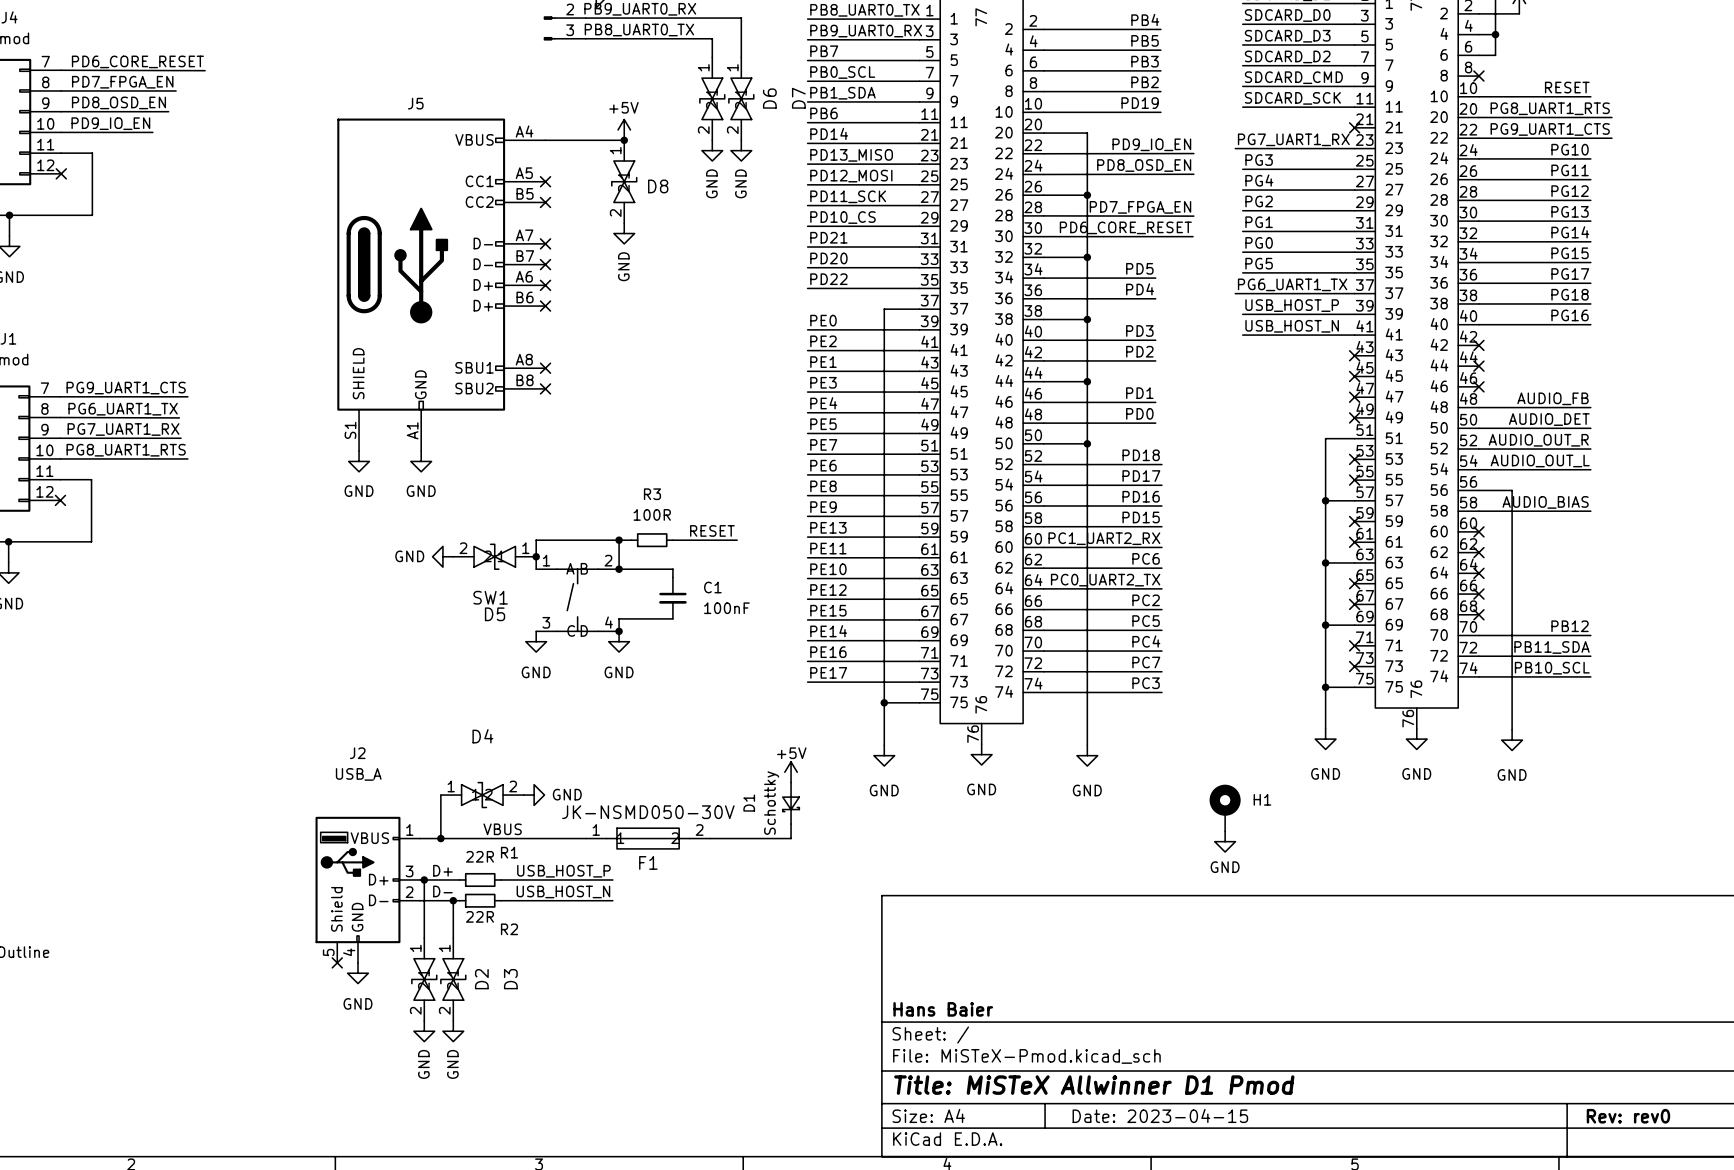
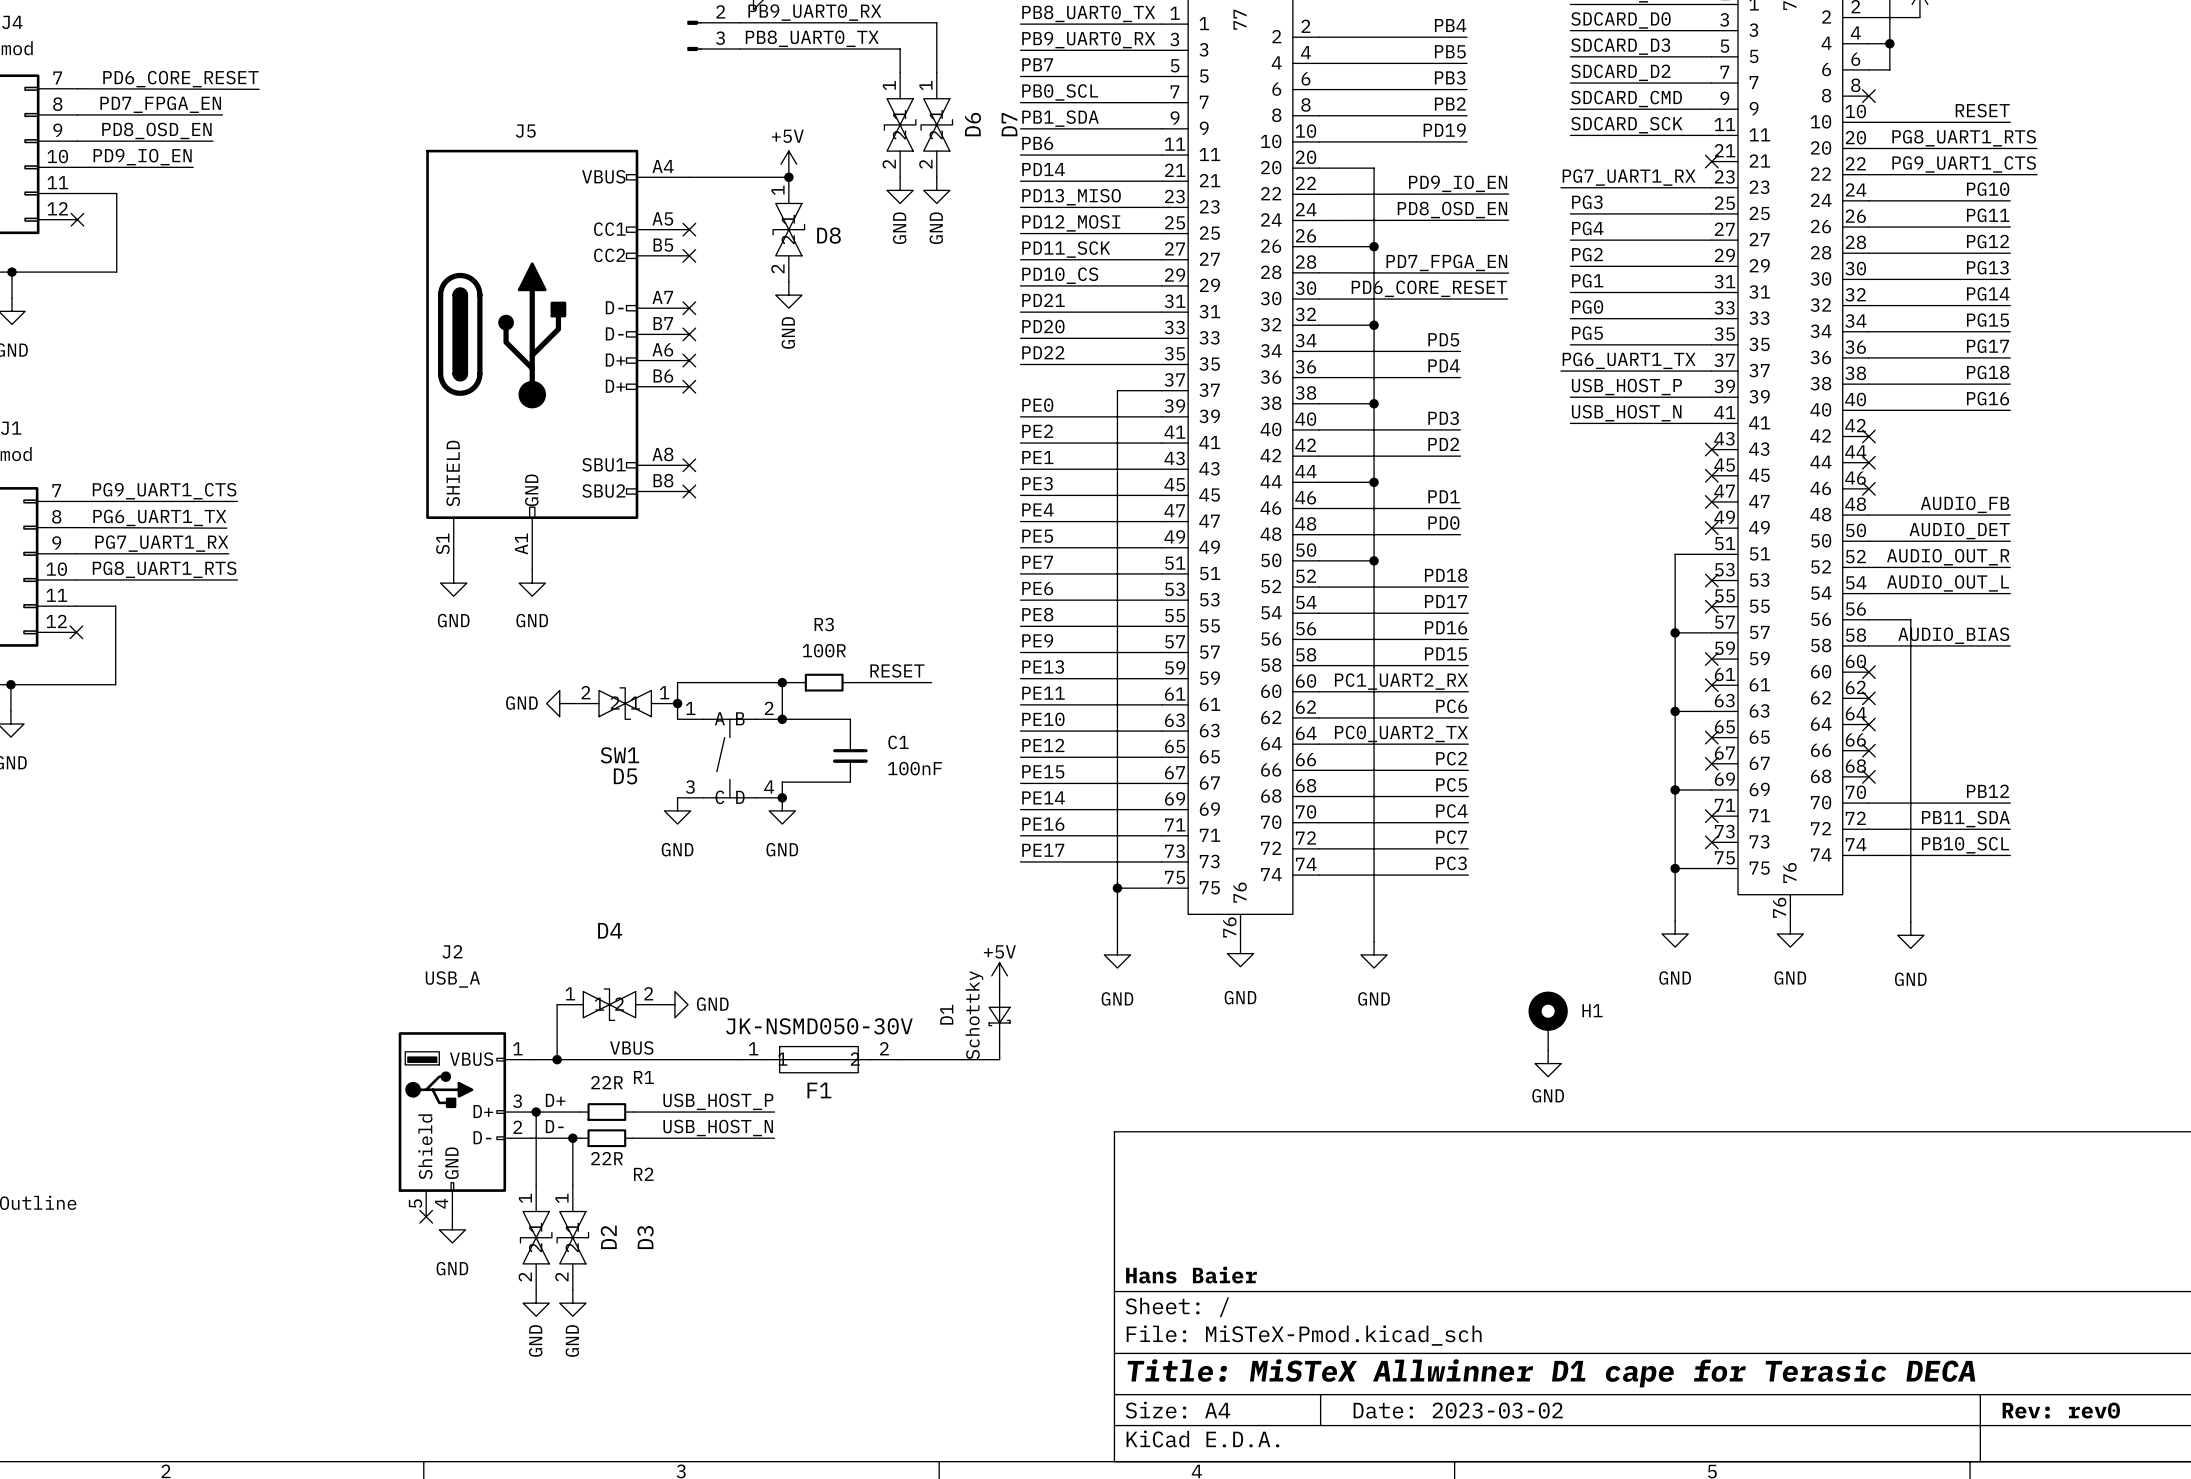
title block: Title: MiSTeX Allwinner D1 Pmod (1094, 1085) -> Title: MiSTeX Allwinner D1 cape for Terasic DECA (1551, 1373)
title block: Date: 2023-04-15 (1160, 1115) -> Date: 2023-03-02 (1458, 1410)

